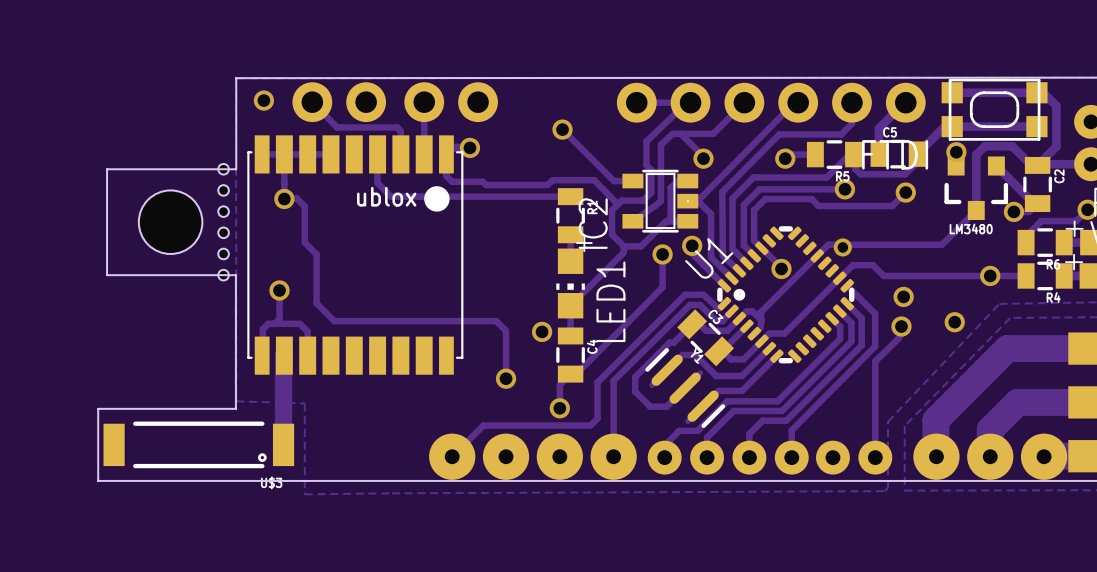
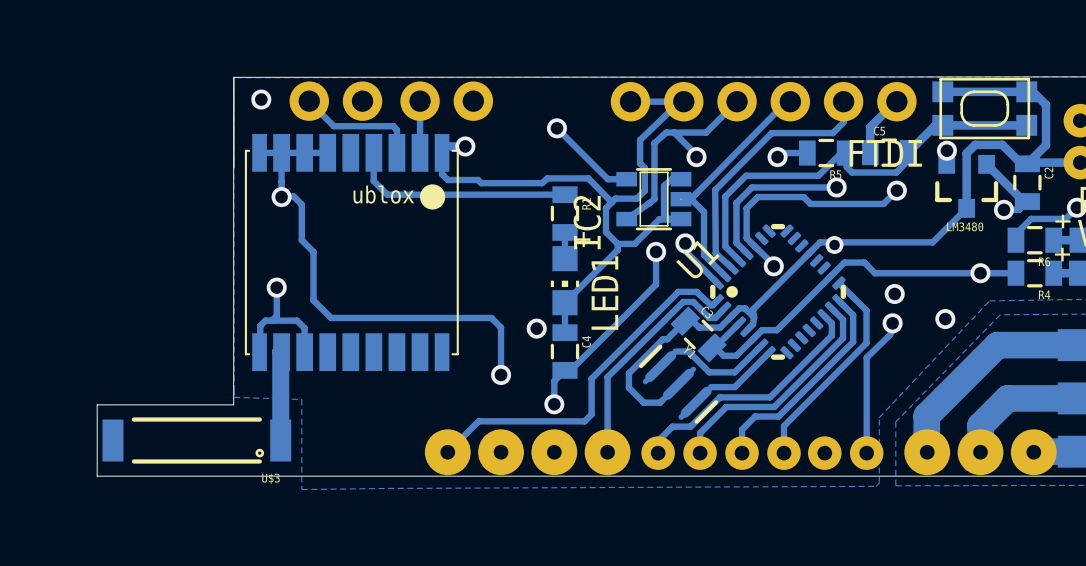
hole: (223, 169) -> none
board edge: (235, 169) (107, 169) (107, 275) (235, 275) -> (233, 167) (233, 272)
hole: (223, 190) -> none
hole: (223, 211) -> none
hole: (170, 222) -> none
hole: (223, 232) -> none
hole: (223, 253) -> none
hole: (223, 275) -> none

